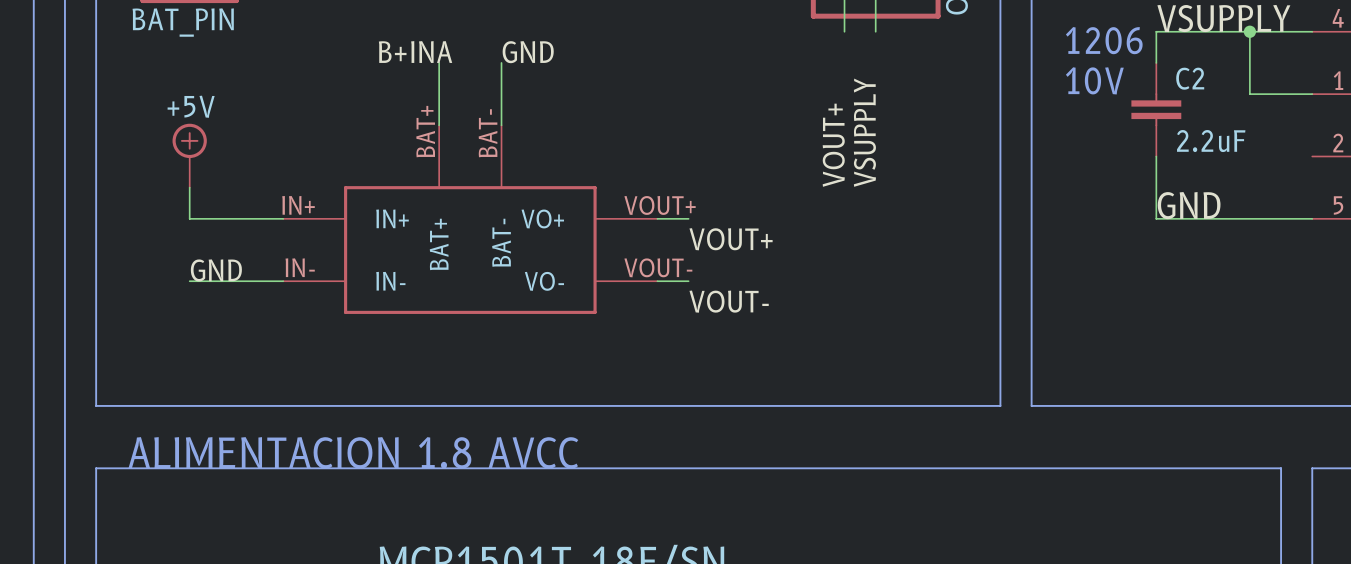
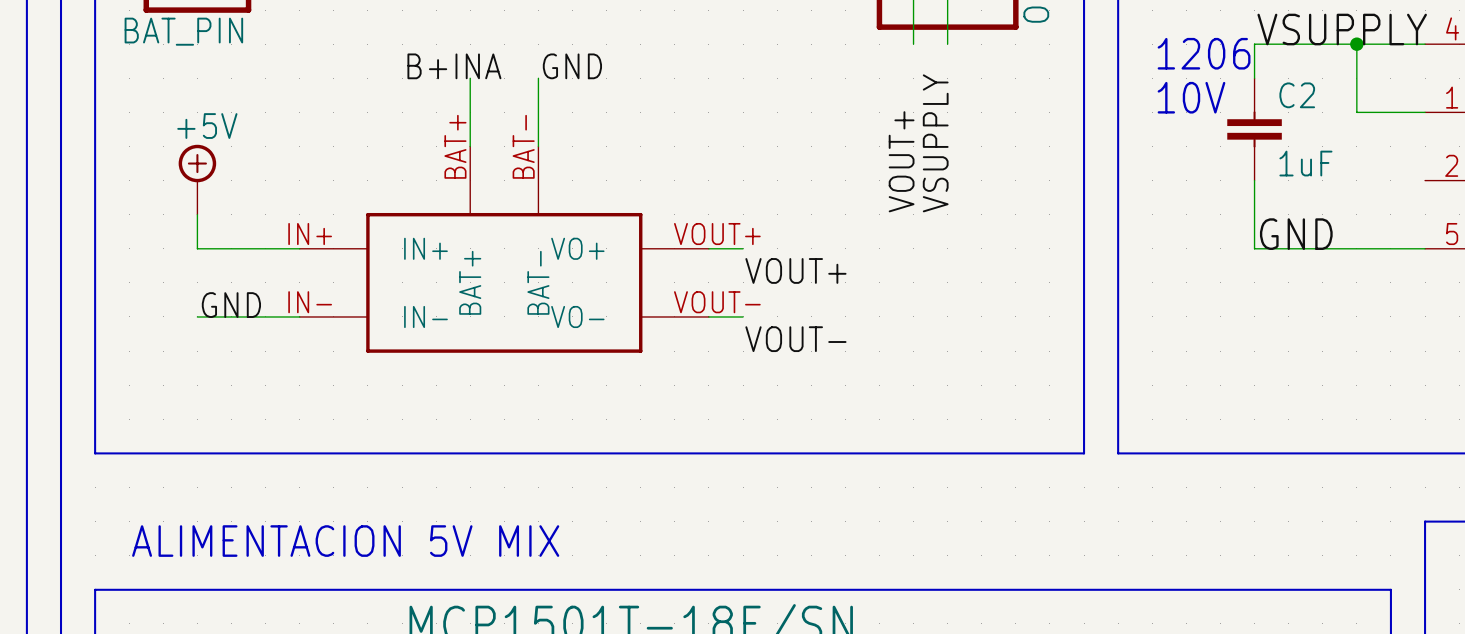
C2 value: 2.2uF (1211, 141) -> 1uF (1305, 163)
text: ALIMENTACION 1.8 AVCC (353, 452) -> ALIMENTACION 5V MIX (345, 541)
line: (96, 530) (96, 468) (1281, 468) (1281, 530) -> (95, 589) (1390, 589)

